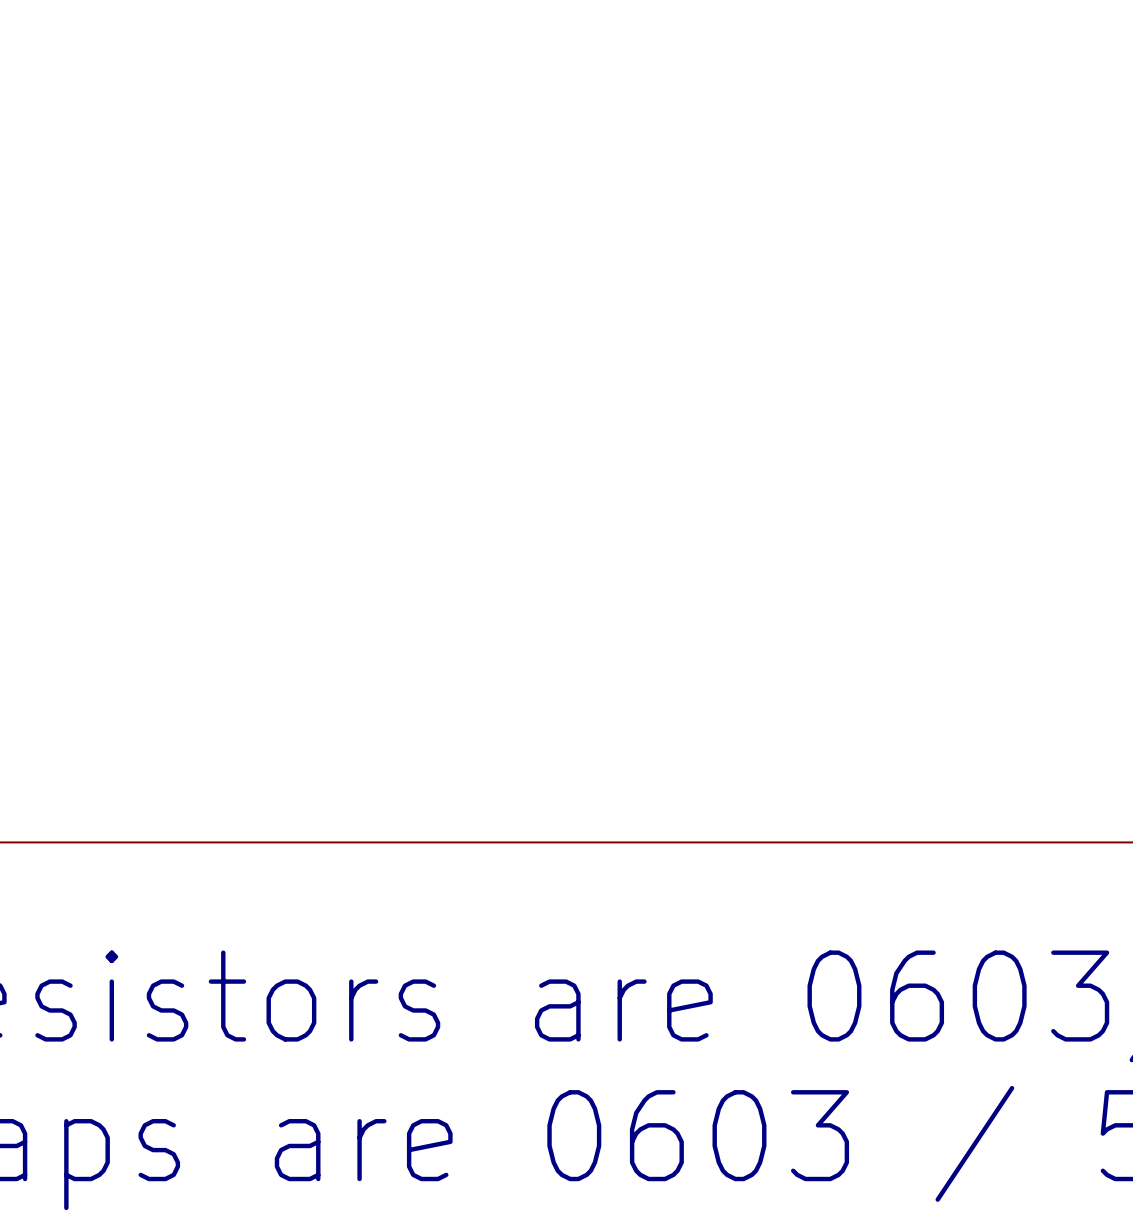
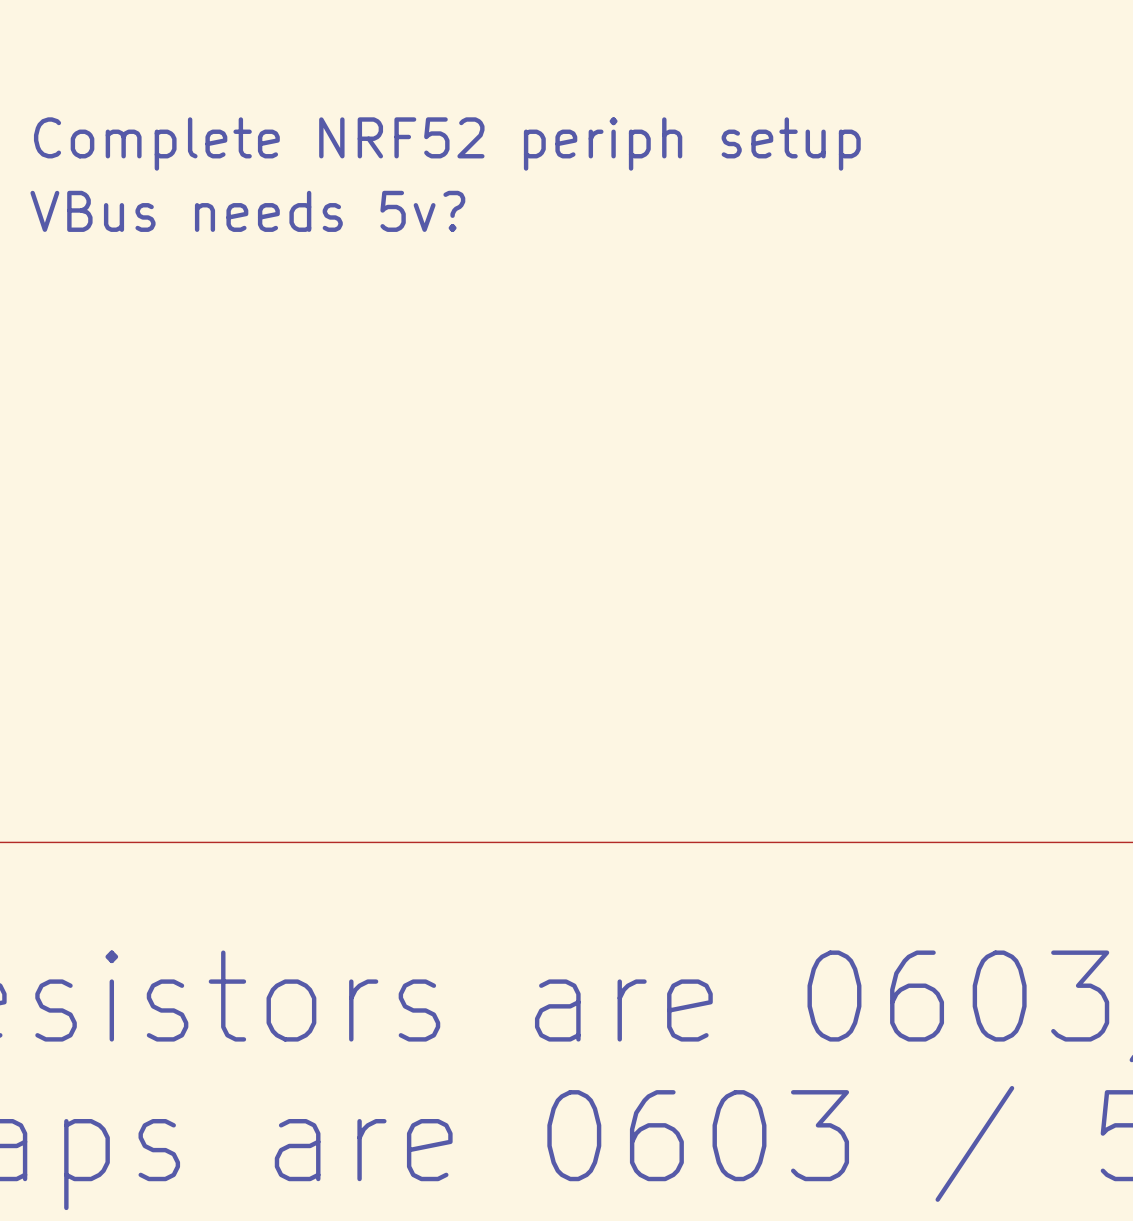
text: none -> Complete NRF52 periph setup (447, 143)
text: none -> VBus needs 5v? (247, 211)

